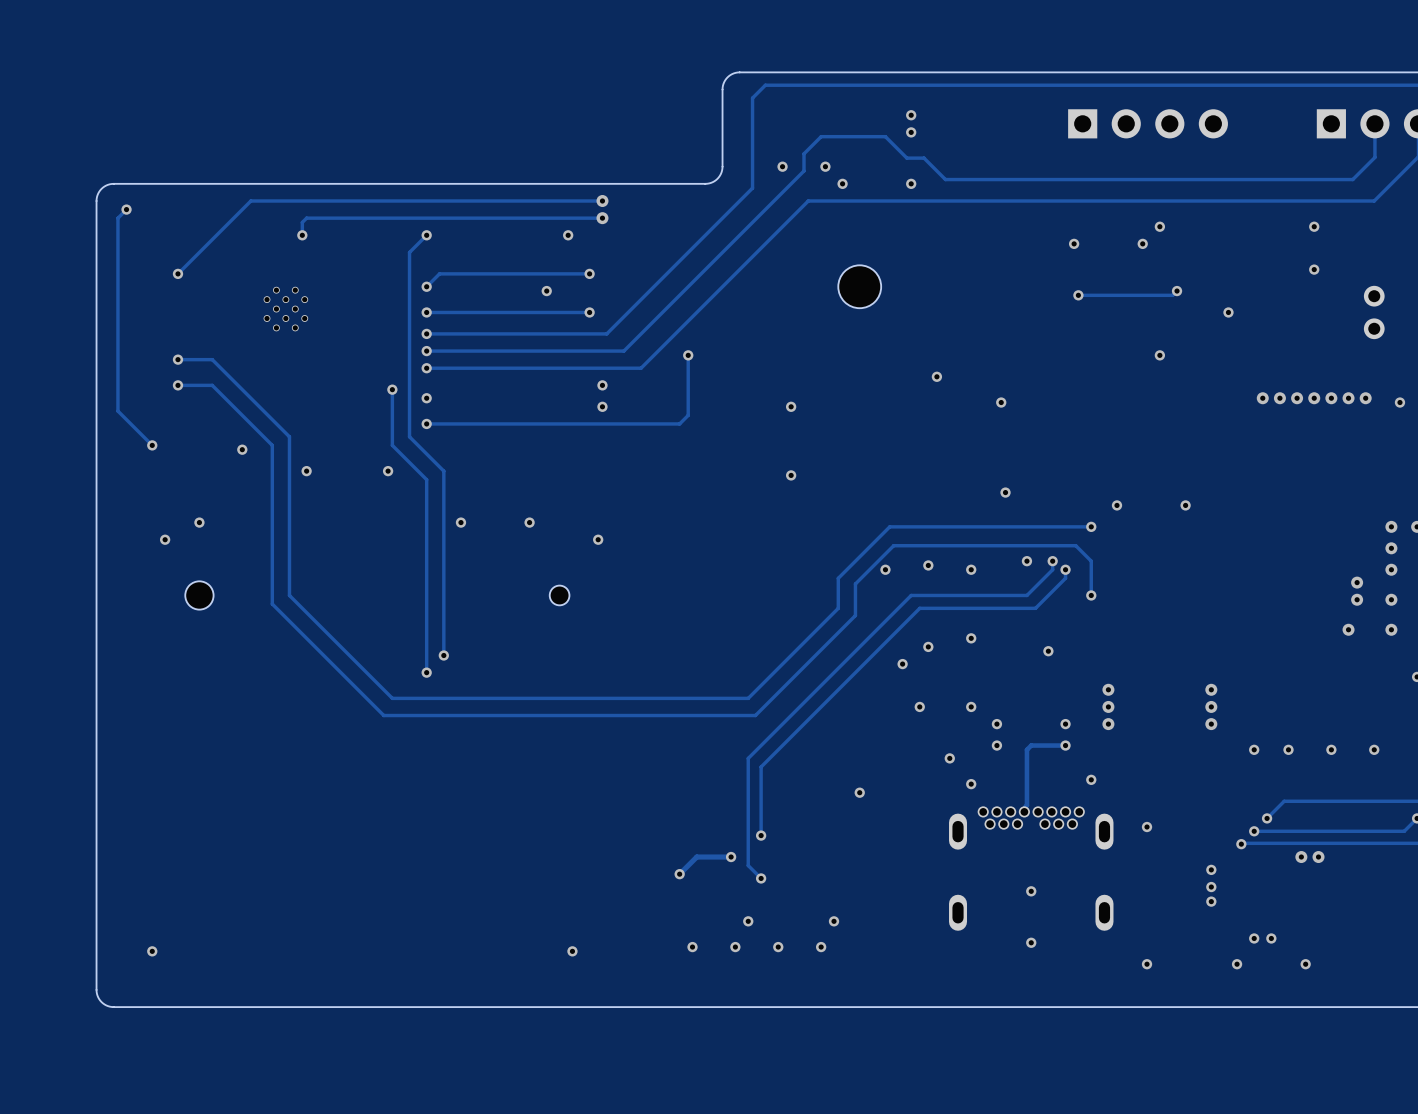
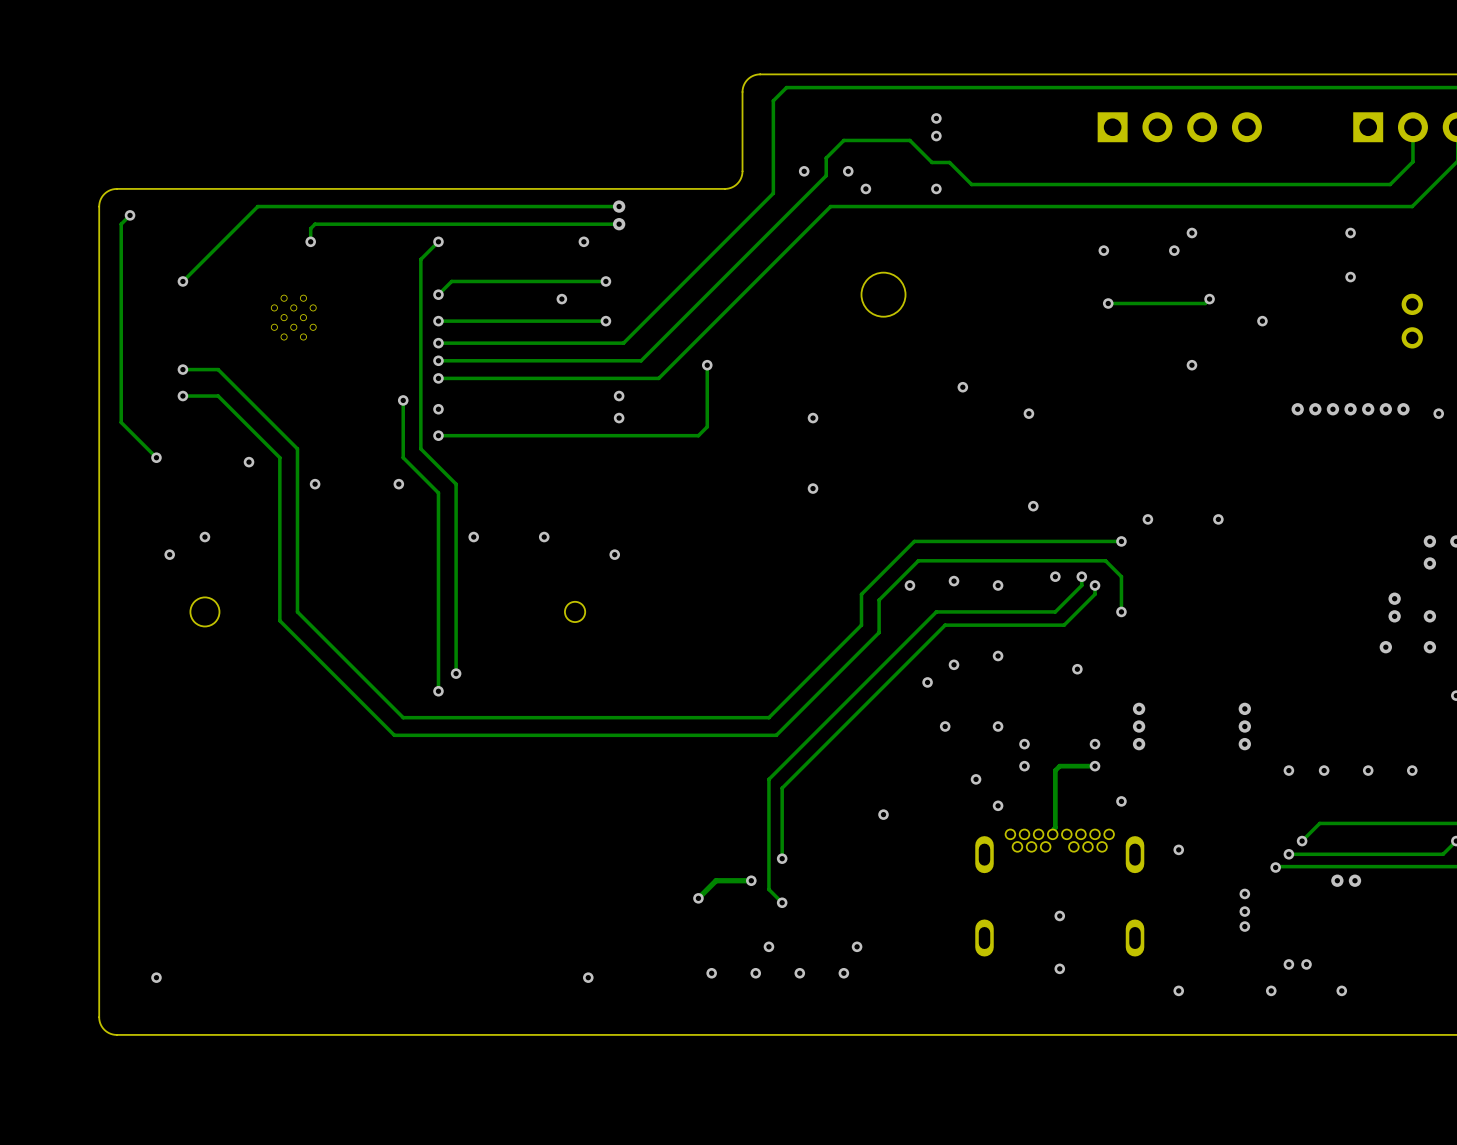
via: (1391, 569) -> none

